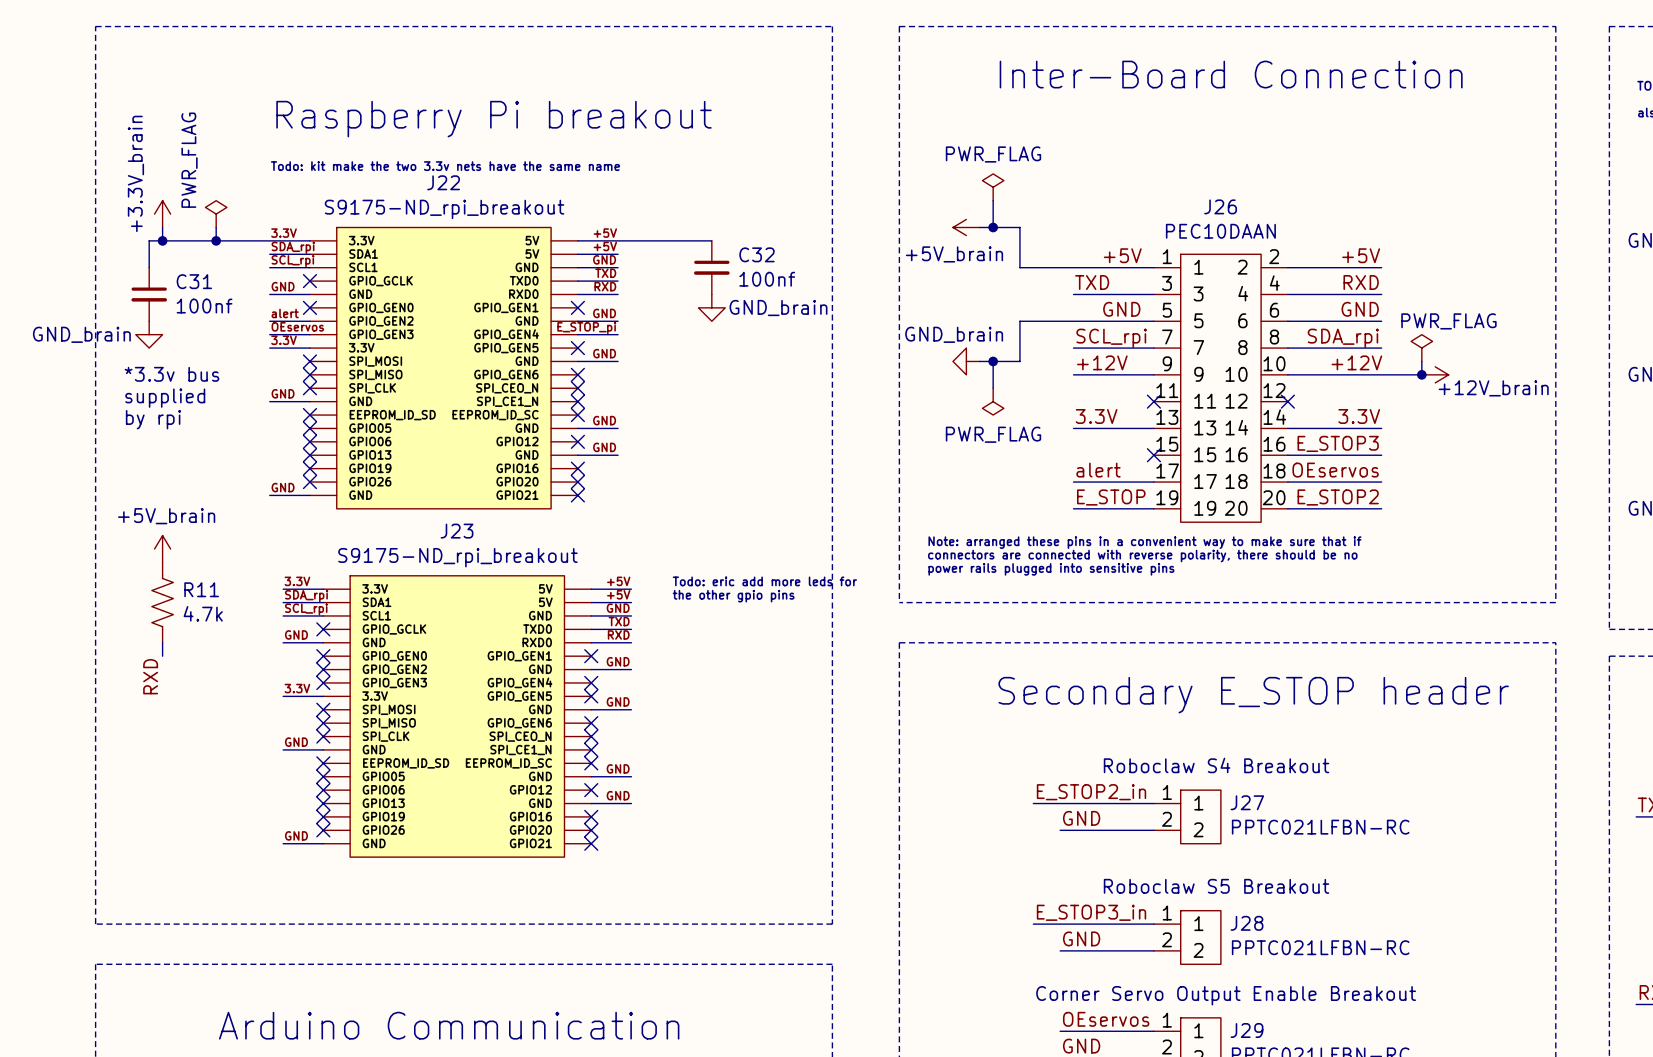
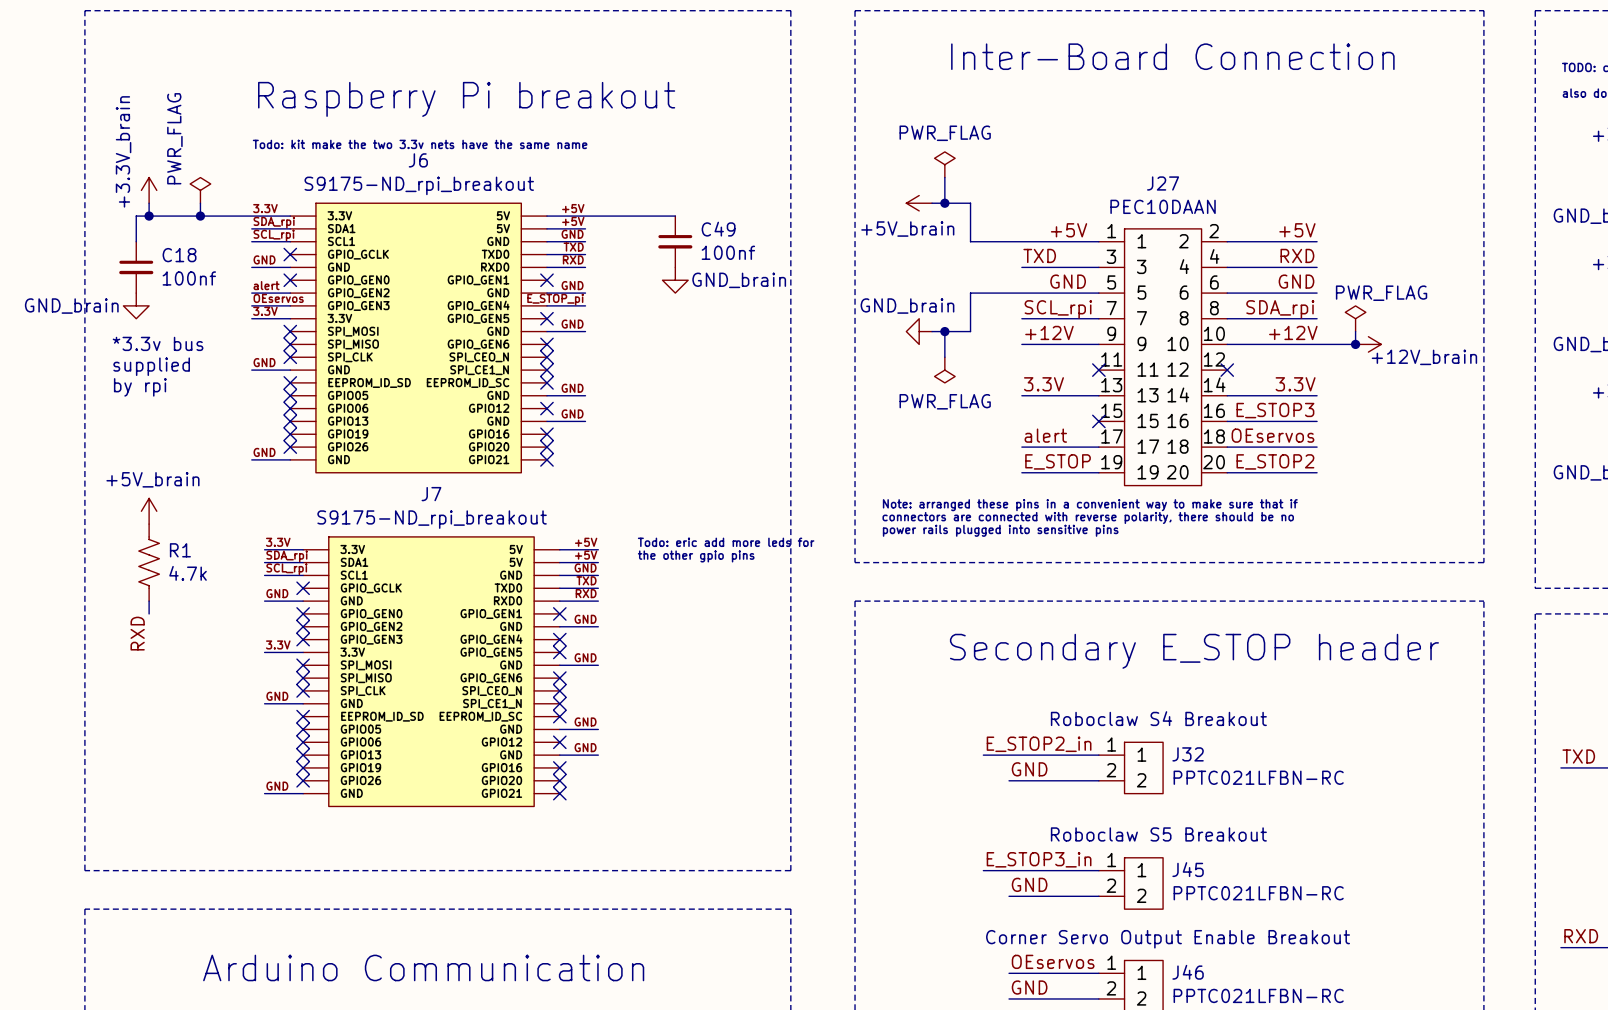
J22 name: J22 (443, 182) -> J6 (418, 160)
J26 name: J26 (1220, 206) -> J27 (1163, 183)
C32 name: C32 (757, 254) -> C49 (718, 229)
C31 name: C31 (194, 281) -> C18 (179, 255)
J23 name: J23 (456, 531) -> J7 (431, 494)
R11 name: R11 (201, 589) -> R1 (180, 550)
J27 name: J27 (1247, 802) -> J32 (1188, 754)
J28 name: J28 (1247, 923) -> J45 (1188, 869)
J29 name: J29 (1247, 1030) -> J46 (1188, 972)

